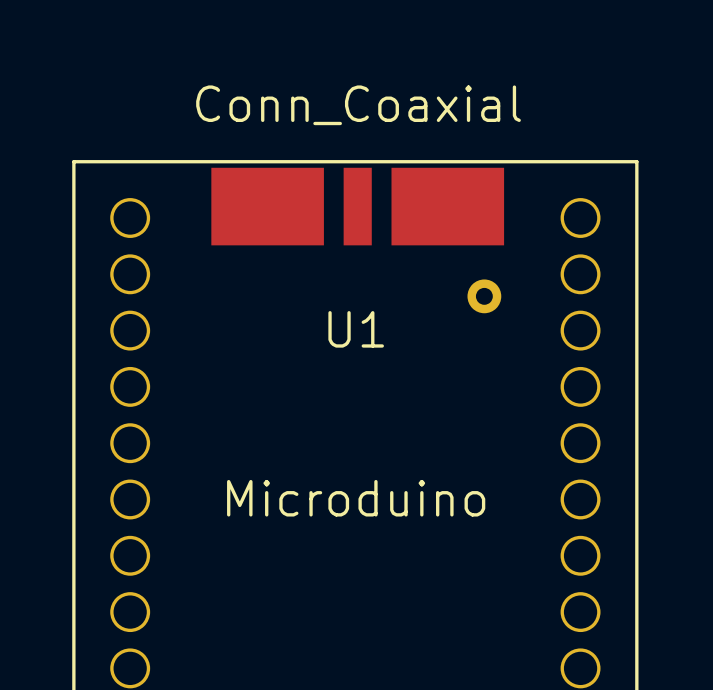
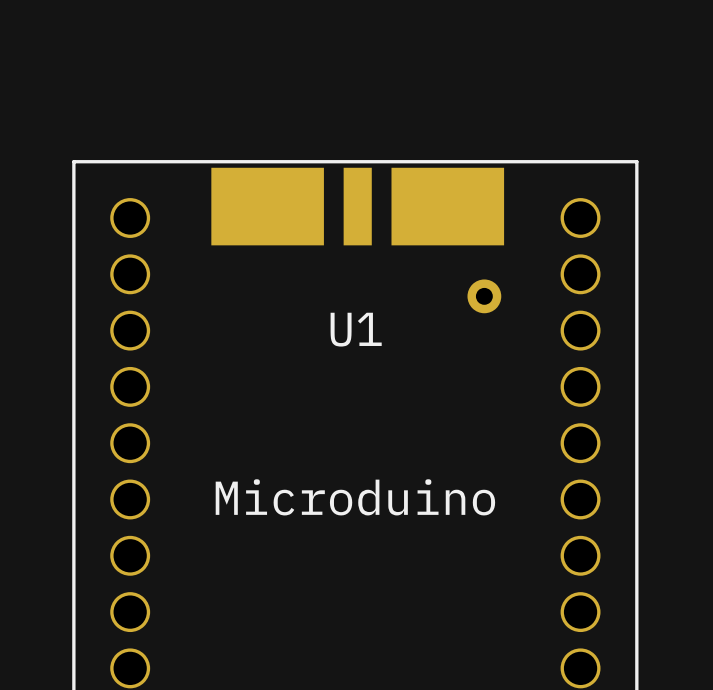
part value: Conn_Coaxial (358, 105) -> none

